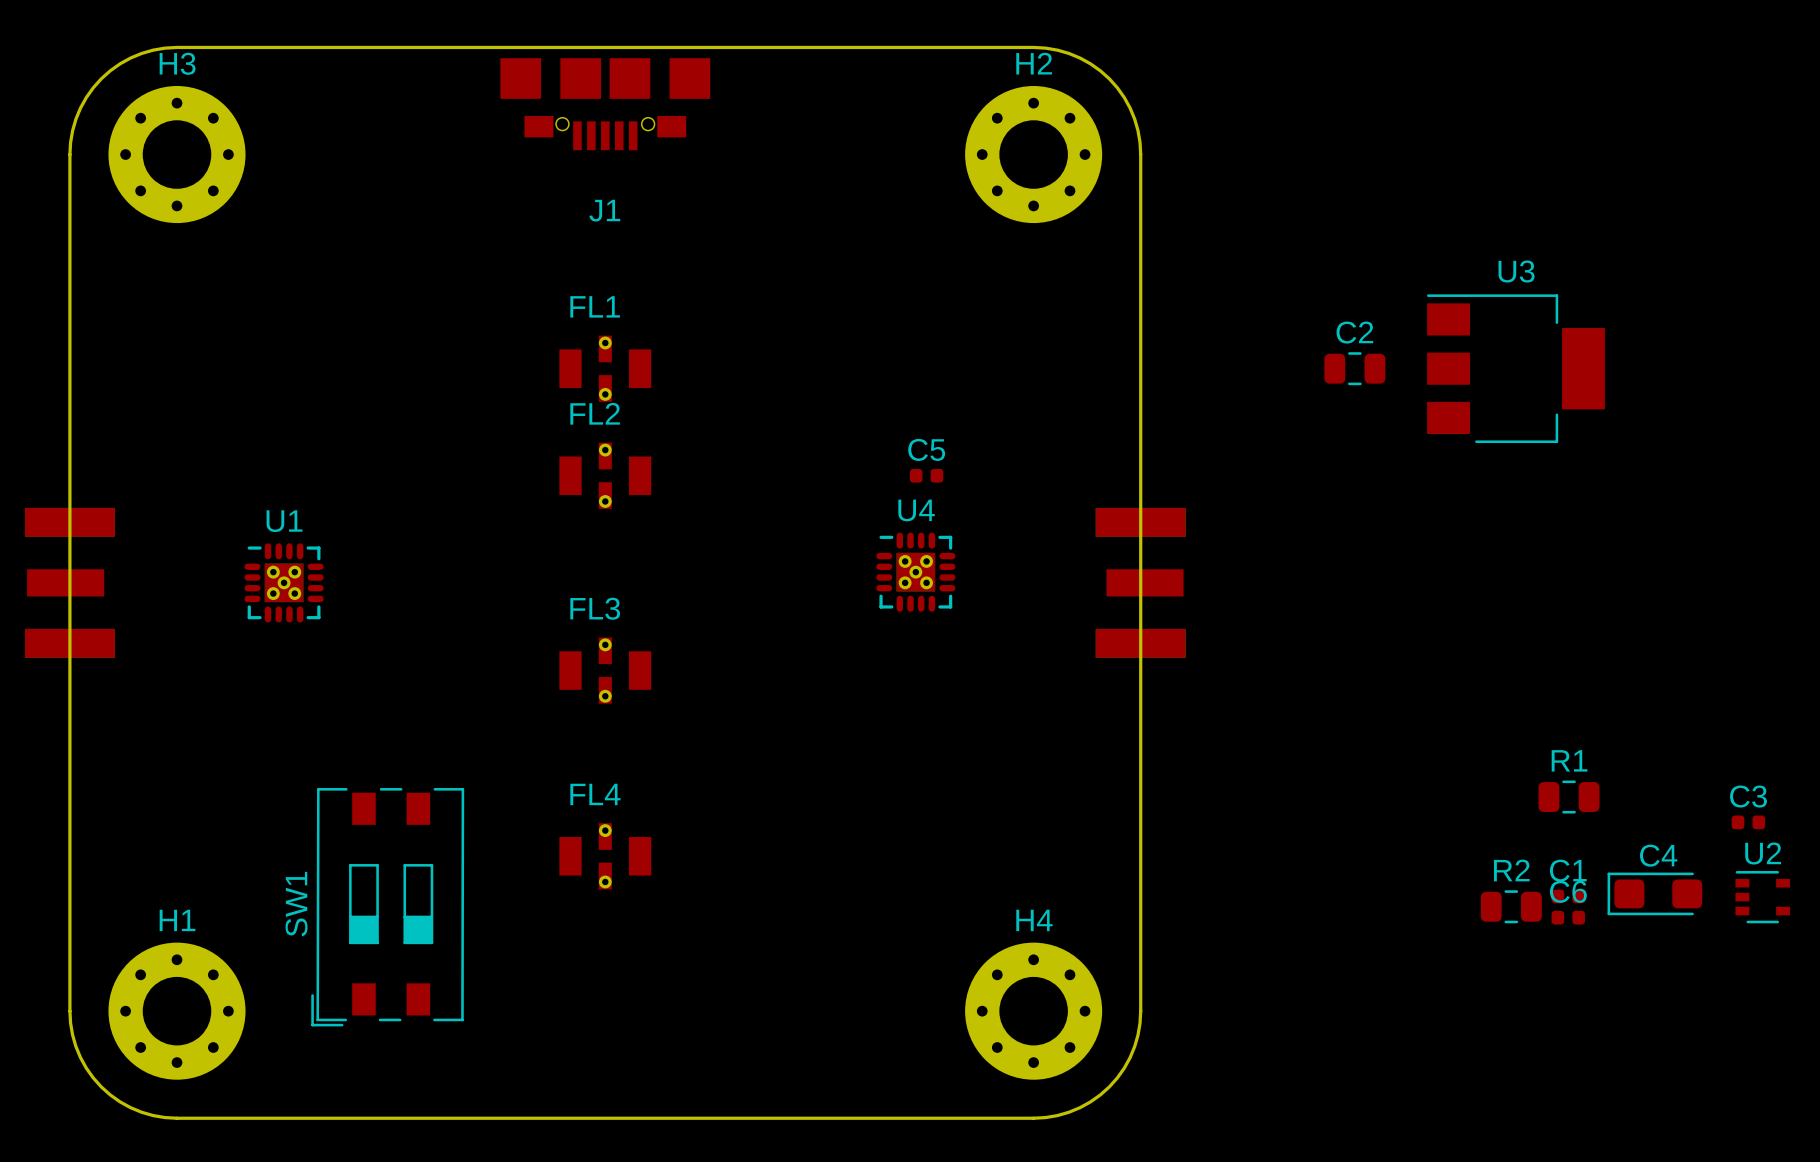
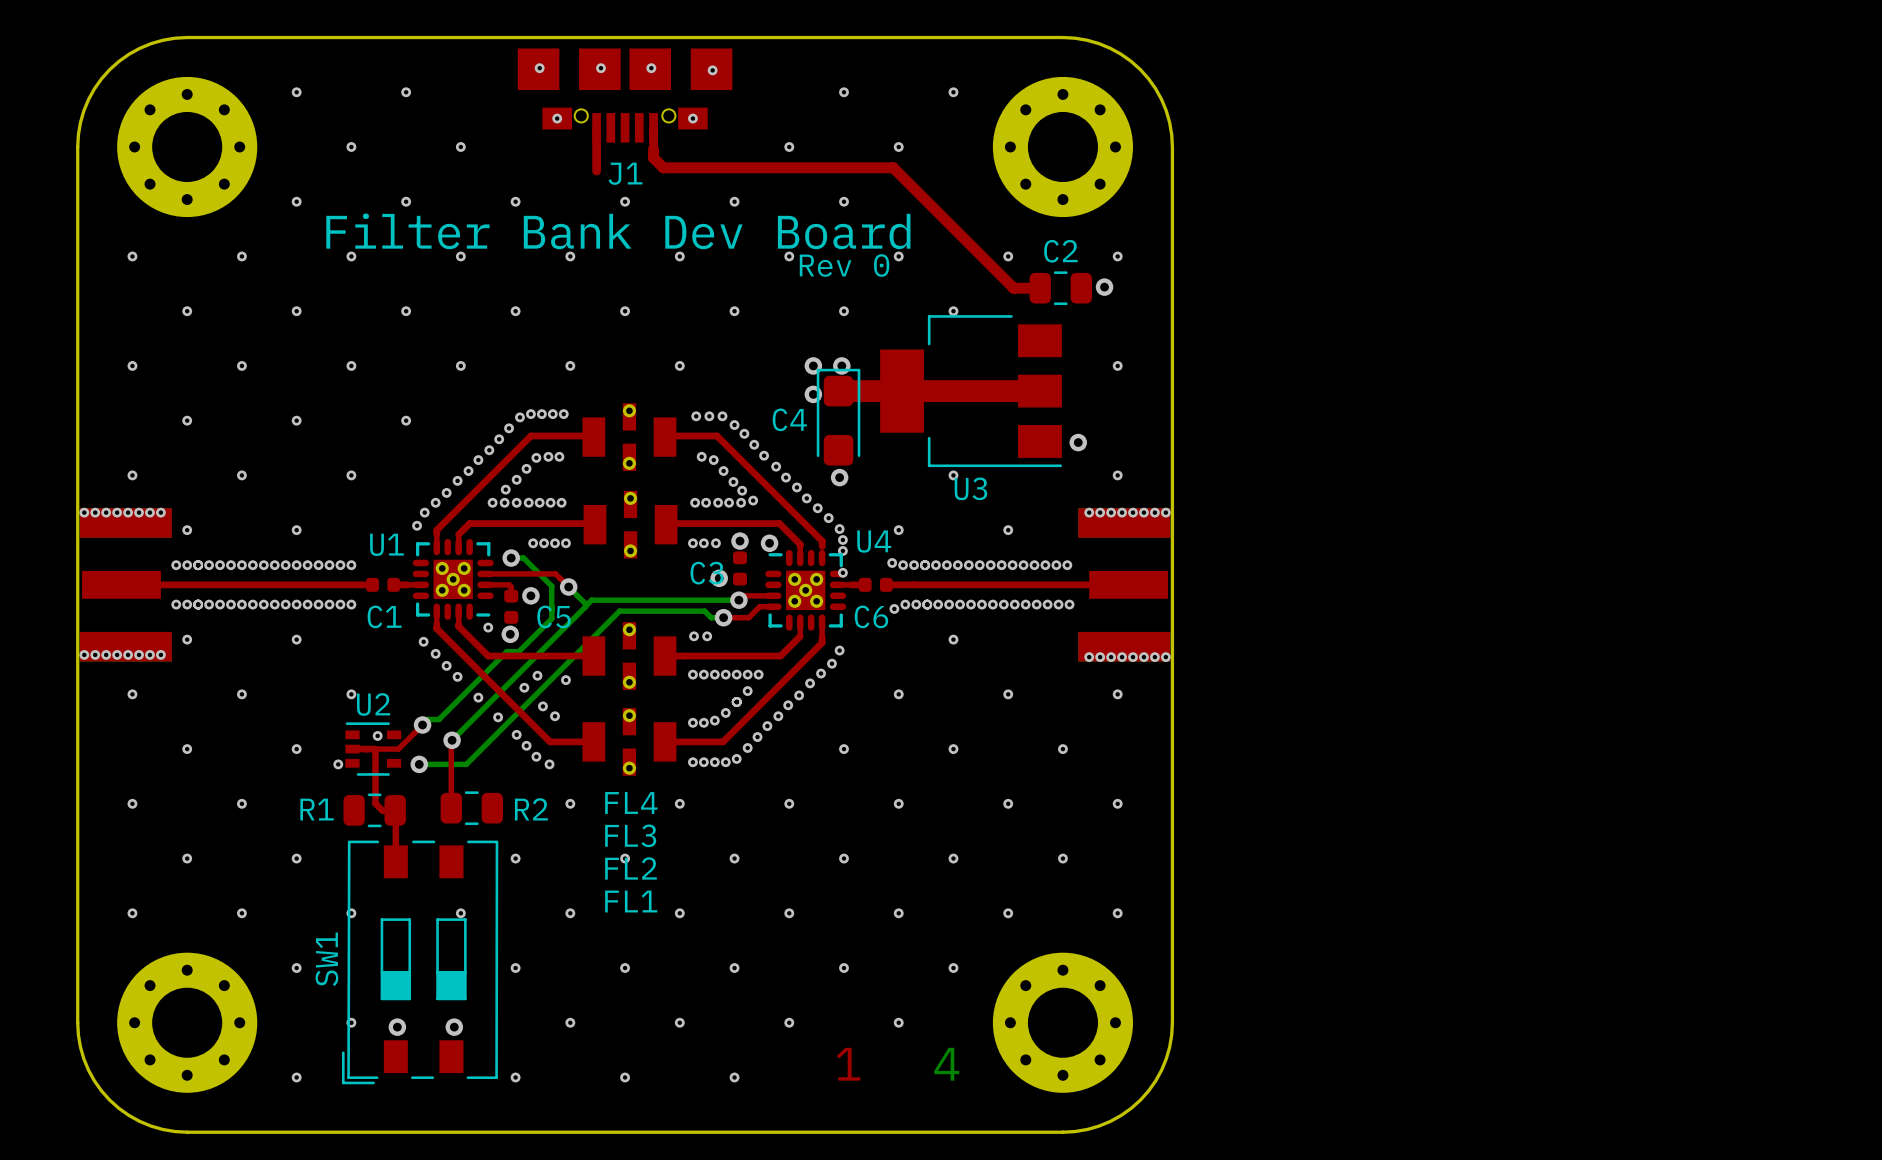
H3 name: H3 (177, 63) -> none
H2 name: H2 (1034, 63) -> none
via: none -> (539, 68)
via: none -> (600, 68)
via: none -> (651, 68)
via: none -> (712, 70)
via: none -> (296, 92)
via: none -> (406, 92)
via: none -> (844, 92)
via: none -> (953, 92)
via: none -> (557, 118)
via: none -> (692, 118)
top track: none -> (596, 127) (596, 171)
top track: none -> (653, 127) (653, 157) (663, 167) (893, 167) (1013, 288) (1040, 288)
via: none -> (351, 146)
via: none -> (460, 146)
via: none -> (789, 146)
via: none -> (898, 146)
via: none -> (296, 201)
via: none -> (406, 201)
via: none -> (515, 201)
via: none -> (625, 201)
via: none -> (734, 201)
via: none -> (844, 201)
J1 name position: J1 (604, 210) -> J1 (625, 173)
drawing: none -> [326, 213, 911, 277]
via: none -> (132, 256)
via: none -> (241, 256)
via: none -> (351, 256)
via: none -> (460, 256)
via: none -> (570, 256)
via: none -> (679, 256)
via: none -> (789, 256)
via: none -> (898, 256)
via: none -> (1008, 256)
via: none -> (1117, 256)
via: none -> (1104, 287)
FL1 name position: FL1 (595, 306) -> FL1 (631, 901)
via: none -> (187, 311)
via: none -> (296, 311)
via: none -> (406, 311)
via: none -> (515, 311)
via: none -> (625, 311)
via: none -> (734, 311)
via: none -> (844, 311)
via: none -> (953, 311)
via: none -> (132, 365)
via: none -> (241, 365)
via: none -> (351, 365)
via: none -> (460, 365)
via: none -> (570, 365)
FL1 position: (605, 368) -> (629, 741)
via: none -> (679, 365)
via: none -> (813, 365)
via: none -> (841, 365)
via: none -> (1117, 365)
C2 position: (1354, 368) -> (1060, 288)
U3 rotation: 0° (1515, 368) -> 180° (971, 391)
U3 position: (1515, 368) -> (971, 391)
top track: none -> (838, 391) (1039, 391)
via: none -> (813, 394)
FL2 name position: FL2 (595, 413) -> FL2 (630, 868)
via: none -> (530, 414)
via: none -> (541, 414)
via: none -> (552, 414)
via: none -> (563, 414)
via: none -> (696, 416)
via: none -> (709, 416)
via: none -> (722, 416)
via: none -> (519, 417)
via: none -> (187, 420)
via: none -> (296, 420)
via: none -> (406, 420)
via: none -> (734, 425)
via: none -> (509, 428)
via: none -> (744, 433)
top track: none -> (593, 435) (530, 435) (436, 530) (436, 547)
top track: none -> (665, 435) (717, 435) (822, 541) (822, 546)
via: none -> (499, 439)
via: none -> (1078, 442)
via: none -> (754, 444)
via: none -> (489, 450)
via: none -> (764, 455)
via: none -> (548, 456)
via: none -> (559, 456)
via: none -> (701, 456)
via: none -> (536, 457)
via: none -> (478, 460)
via: none -> (713, 460)
via: none -> (776, 466)
via: none -> (526, 468)
via: none -> (468, 471)
via: none -> (723, 471)
via: none -> (132, 475)
via: none -> (241, 475)
via: none -> (351, 475)
FL2 position: (605, 475) -> (629, 656)
C5 rotation: 0° (926, 475) -> 90° clockwise (511, 606)
C5 position: (926, 475) -> (511, 606)
via: none -> (953, 475)
via: none -> (1117, 475)
via: none -> (785, 477)
via: none -> (839, 477)
via: none -> (516, 479)
via: none -> (457, 480)
via: none -> (733, 481)
via: none -> (796, 487)
via: none -> (505, 489)
via: none -> (742, 490)
via: none -> (446, 492)
via: none -> (806, 498)
via: none -> (753, 500)
via: none -> (435, 502)
via: none -> (492, 502)
via: none -> (504, 502)
via: none -> (516, 502)
via: none -> (528, 502)
via: none -> (539, 502)
via: none -> (550, 502)
via: none -> (561, 502)
via: none -> (695, 502)
via: none -> (706, 502)
via: none -> (718, 502)
via: none -> (729, 502)
via: none -> (741, 502)
via: none -> (817, 508)
U4 name position: U4 (916, 510) -> U4 (874, 541)
via: none -> (84, 512)
via: none -> (95, 512)
via: none -> (106, 512)
via: none -> (117, 512)
via: none -> (128, 512)
via: none -> (139, 512)
via: none -> (149, 512)
via: none -> (160, 512)
via: none -> (424, 512)
via: none -> (1089, 512)
via: none -> (1100, 512)
via: none -> (1111, 512)
via: none -> (1122, 512)
via: none -> (1133, 512)
via: none -> (1143, 512)
via: none -> (1154, 512)
via: none -> (1165, 512)
via: none -> (828, 518)
U1 name position: U1 (284, 521) -> U1 (386, 544)
top track: none -> (593, 523) (469, 523) (458, 534) (458, 547)
top track: none -> (665, 523) (779, 523) (800, 544) (800, 558)
via: none -> (417, 525)
via: none -> (839, 529)
via: none -> (187, 530)
via: none -> (296, 530)
via: none -> (898, 530)
via: none -> (1008, 530)
U4 footprint: [876, 532, 956, 612] -> [765, 549, 847, 631]
via: none -> (842, 539)
via: none -> (740, 541)
via: none -> (533, 543)
via: none -> (544, 543)
via: none -> (555, 543)
via: none -> (565, 543)
via: none -> (692, 543)
via: none -> (703, 543)
via: none -> (715, 543)
via: none -> (769, 543)
U1 footprint: [244, 543, 324, 623] -> [412, 538, 494, 620]
via: none -> (842, 550)
bottom track: none -> (511, 558) (523, 558) (551, 586) (551, 618) (518, 651) (506, 651) (438, 719) (428, 719) (422, 724)
via: none -> (511, 558)
via: none -> (892, 562)
via: none -> (176, 565)
via: none -> (187, 565)
via: none -> (198, 565)
via: none -> (209, 565)
via: none -> (220, 565)
via: none -> (230, 565)
via: none -> (241, 565)
via: none -> (252, 565)
via: none -> (263, 565)
via: none -> (274, 565)
via: none -> (285, 565)
via: none -> (296, 565)
via: none -> (307, 565)
via: none -> (318, 565)
via: none -> (329, 565)
via: none -> (340, 565)
via: none -> (351, 565)
via: none -> (903, 565)
via: none -> (914, 565)
via: none -> (925, 565)
via: none -> (935, 565)
via: none -> (946, 565)
via: none -> (957, 565)
via: none -> (968, 565)
via: none -> (979, 565)
via: none -> (990, 565)
via: none -> (1001, 565)
via: none -> (1012, 565)
via: none -> (1023, 565)
via: none -> (1034, 565)
via: none -> (1045, 565)
via: none -> (1056, 565)
via: none -> (1067, 565)
via: none -> (842, 572)
top track: none -> (485, 573) (555, 573) (568, 587)
via: none -> (719, 578)
part position: (69, 582) -> (125, 584)
top track: none -> (121, 584) (372, 584)
top track: none -> (393, 584) (420, 584)
top track: none -> (485, 584) (509, 584) (511, 587) (510, 595)
top track: none -> (837, 584) (865, 584)
top track: none -> (886, 584) (1128, 584)
part position: (1140, 582) -> (1124, 584)
bottom track: none -> (568, 587) (585, 603) (585, 606) (452, 740)
via: none -> (568, 587)
via: none -> (530, 595)
top track: none -> (773, 595) (743, 595) (738, 600)
bottom track: none -> (738, 600) (591, 600) (585, 606)
via: none -> (738, 600)
via: none -> (176, 604)
via: none -> (187, 604)
via: none -> (198, 604)
via: none -> (209, 604)
via: none -> (220, 604)
via: none -> (230, 604)
via: none -> (241, 604)
via: none -> (252, 604)
via: none -> (263, 604)
via: none -> (274, 604)
via: none -> (285, 604)
via: none -> (296, 604)
via: none -> (307, 604)
via: none -> (318, 604)
via: none -> (329, 604)
via: none -> (340, 604)
via: none -> (351, 604)
via: none -> (905, 604)
via: none -> (916, 604)
via: none -> (927, 604)
via: none -> (938, 604)
via: none -> (949, 604)
via: none -> (960, 604)
via: none -> (970, 604)
via: none -> (981, 604)
via: none -> (992, 604)
via: none -> (1003, 604)
via: none -> (1014, 604)
via: none -> (1025, 604)
via: none -> (1036, 604)
via: none -> (1047, 604)
via: none -> (1058, 604)
via: none -> (1069, 604)
top track: none -> (773, 606) (759, 606) (748, 617) (723, 617)
via: none -> (894, 608)
FL3 name position: FL3 (595, 608) -> FL3 (630, 835)
top track: none -> (436, 611) (436, 628) (550, 741) (593, 741)
top track: none -> (458, 611) (458, 626) (488, 656) (593, 656)
bottom track: none -> (723, 617) (711, 617) (704, 611) (619, 611) (466, 764) (419, 764)
via: none -> (723, 617)
top track: none -> (800, 622) (800, 636) (780, 656) (665, 656)
top track: none -> (822, 622) (822, 642) (723, 741) (665, 741)
via: none -> (488, 627)
via: none -> (510, 634)
via: none -> (694, 636)
via: none -> (707, 636)
via: none -> (187, 639)
via: none -> (296, 639)
via: none -> (953, 639)
via: none -> (423, 641)
via: none -> (839, 650)
via: none -> (435, 653)
via: none -> (84, 654)
via: none -> (95, 654)
via: none -> (106, 654)
via: none -> (117, 654)
via: none -> (128, 654)
via: none -> (139, 654)
via: none -> (149, 654)
via: none -> (160, 654)
via: none -> (1089, 657)
via: none -> (1100, 657)
via: none -> (1111, 657)
via: none -> (1122, 657)
via: none -> (1133, 657)
via: none -> (1143, 657)
via: none -> (1154, 657)
via: none -> (1165, 657)
via: none -> (831, 663)
via: none -> (446, 665)
via: none -> (821, 673)
FL3 position: (605, 670) -> (630, 524)
via: none -> (692, 674)
via: none -> (703, 674)
via: none -> (714, 674)
via: none -> (725, 674)
via: none -> (736, 674)
via: none -> (747, 674)
via: none -> (758, 674)
via: none -> (537, 675)
via: none -> (457, 676)
via: none -> (565, 680)
via: none -> (810, 683)
via: none -> (524, 687)
via: none -> (747, 691)
via: none -> (132, 694)
via: none -> (241, 694)
via: none -> (351, 694)
via: none -> (898, 694)
via: none -> (1008, 694)
via: none -> (1117, 694)
via: none -> (799, 695)
via: none -> (478, 697)
via: none -> (736, 702)
via: none -> (788, 705)
via: none -> (542, 706)
via: none -> (725, 712)
via: none -> (555, 716)
via: none -> (778, 716)
via: none -> (498, 717)
via: none -> (714, 720)
via: none -> (692, 722)
via: none -> (703, 722)
top track: none -> (422, 724) (398, 749) (367, 749)
via: none -> (422, 724)
via: none -> (767, 726)
via: none -> (516, 734)
via: none -> (377, 735)
via: none -> (757, 737)
top track: none -> (452, 740) (451, 808)
via: none -> (452, 740)
via: none -> (526, 745)
via: none -> (747, 747)
via: none -> (187, 749)
via: none -> (296, 749)
top track: none -> (352, 749) (375, 749) (375, 803) (382, 810) (395, 811) (395, 861)
via: none -> (844, 749)
via: none -> (953, 749)
via: none -> (1062, 749)
via: none -> (536, 756)
via: none -> (736, 758)
via: none -> (692, 762)
via: none -> (703, 762)
via: none -> (714, 762)
via: none -> (725, 762)
via: none -> (338, 764)
via: none -> (419, 764)
via: none -> (549, 764)
R1 name position: R1 (1569, 760) -> R1 (317, 809)
FL4 name position: FL4 (595, 794) -> FL4 (631, 802)
C3 name position: C3 (1748, 796) -> C3 (706, 573)
via: none -> (132, 803)
via: none -> (241, 803)
via: none -> (570, 803)
via: none -> (679, 803)
via: none -> (789, 803)
via: none -> (898, 803)
via: none -> (1008, 803)
via: none -> (1117, 803)
R1 position: (1569, 797) -> (374, 810)
C3 rotation: 0° (1748, 822) -> 90° clockwise (740, 568)
C3 position: (1748, 822) -> (740, 568)
via: none -> (187, 858)
via: none -> (296, 858)
via: none -> (515, 858)
via: none -> (625, 858)
via: none -> (734, 858)
via: none -> (844, 858)
via: none -> (953, 858)
via: none -> (1062, 858)
C4 name position: C4 (1658, 855) -> C4 (789, 419)
FL4 position: (605, 856) -> (629, 437)
R2 name position: R2 (1511, 870) -> R2 (531, 809)
C1 name position: C1 (1568, 870) -> C1 (384, 616)
C6 name position: C6 (1568, 891) -> C6 (871, 616)
C4 rotation: 0° (1654, 893) -> 90° clockwise (838, 417)
C4 position: (1654, 893) -> (838, 417)
C1 position: (1568, 896) -> (383, 584)
U2 position: (1762, 897) -> (373, 749)
via: none -> (132, 913)
via: none -> (241, 913)
via: none -> (351, 913)
via: none -> (460, 913)
via: none -> (570, 913)
via: none -> (679, 913)
via: none -> (789, 913)
via: none -> (898, 913)
via: none -> (1008, 913)
via: none -> (1117, 913)
R2 position: (1511, 906) -> (471, 808)
SW1 position: (387, 907) -> (420, 962)
C6 position: (1568, 917) -> (875, 584)
H1 name: H1 (177, 920) -> none
H4 name: H4 (1034, 920) -> none
via: none -> (296, 968)
via: none -> (515, 968)
via: none -> (625, 968)
via: none -> (734, 968)
via: none -> (844, 968)
via: none -> (953, 968)
via: none -> (351, 1022)
via: none -> (570, 1022)
via: none -> (679, 1022)
via: none -> (789, 1022)
via: none -> (898, 1022)
via: none -> (397, 1027)
via: none -> (454, 1027)
drawing: none -> [836, 1047, 960, 1081]
via: none -> (296, 1077)
via: none -> (515, 1077)
via: none -> (625, 1077)
via: none -> (734, 1077)

